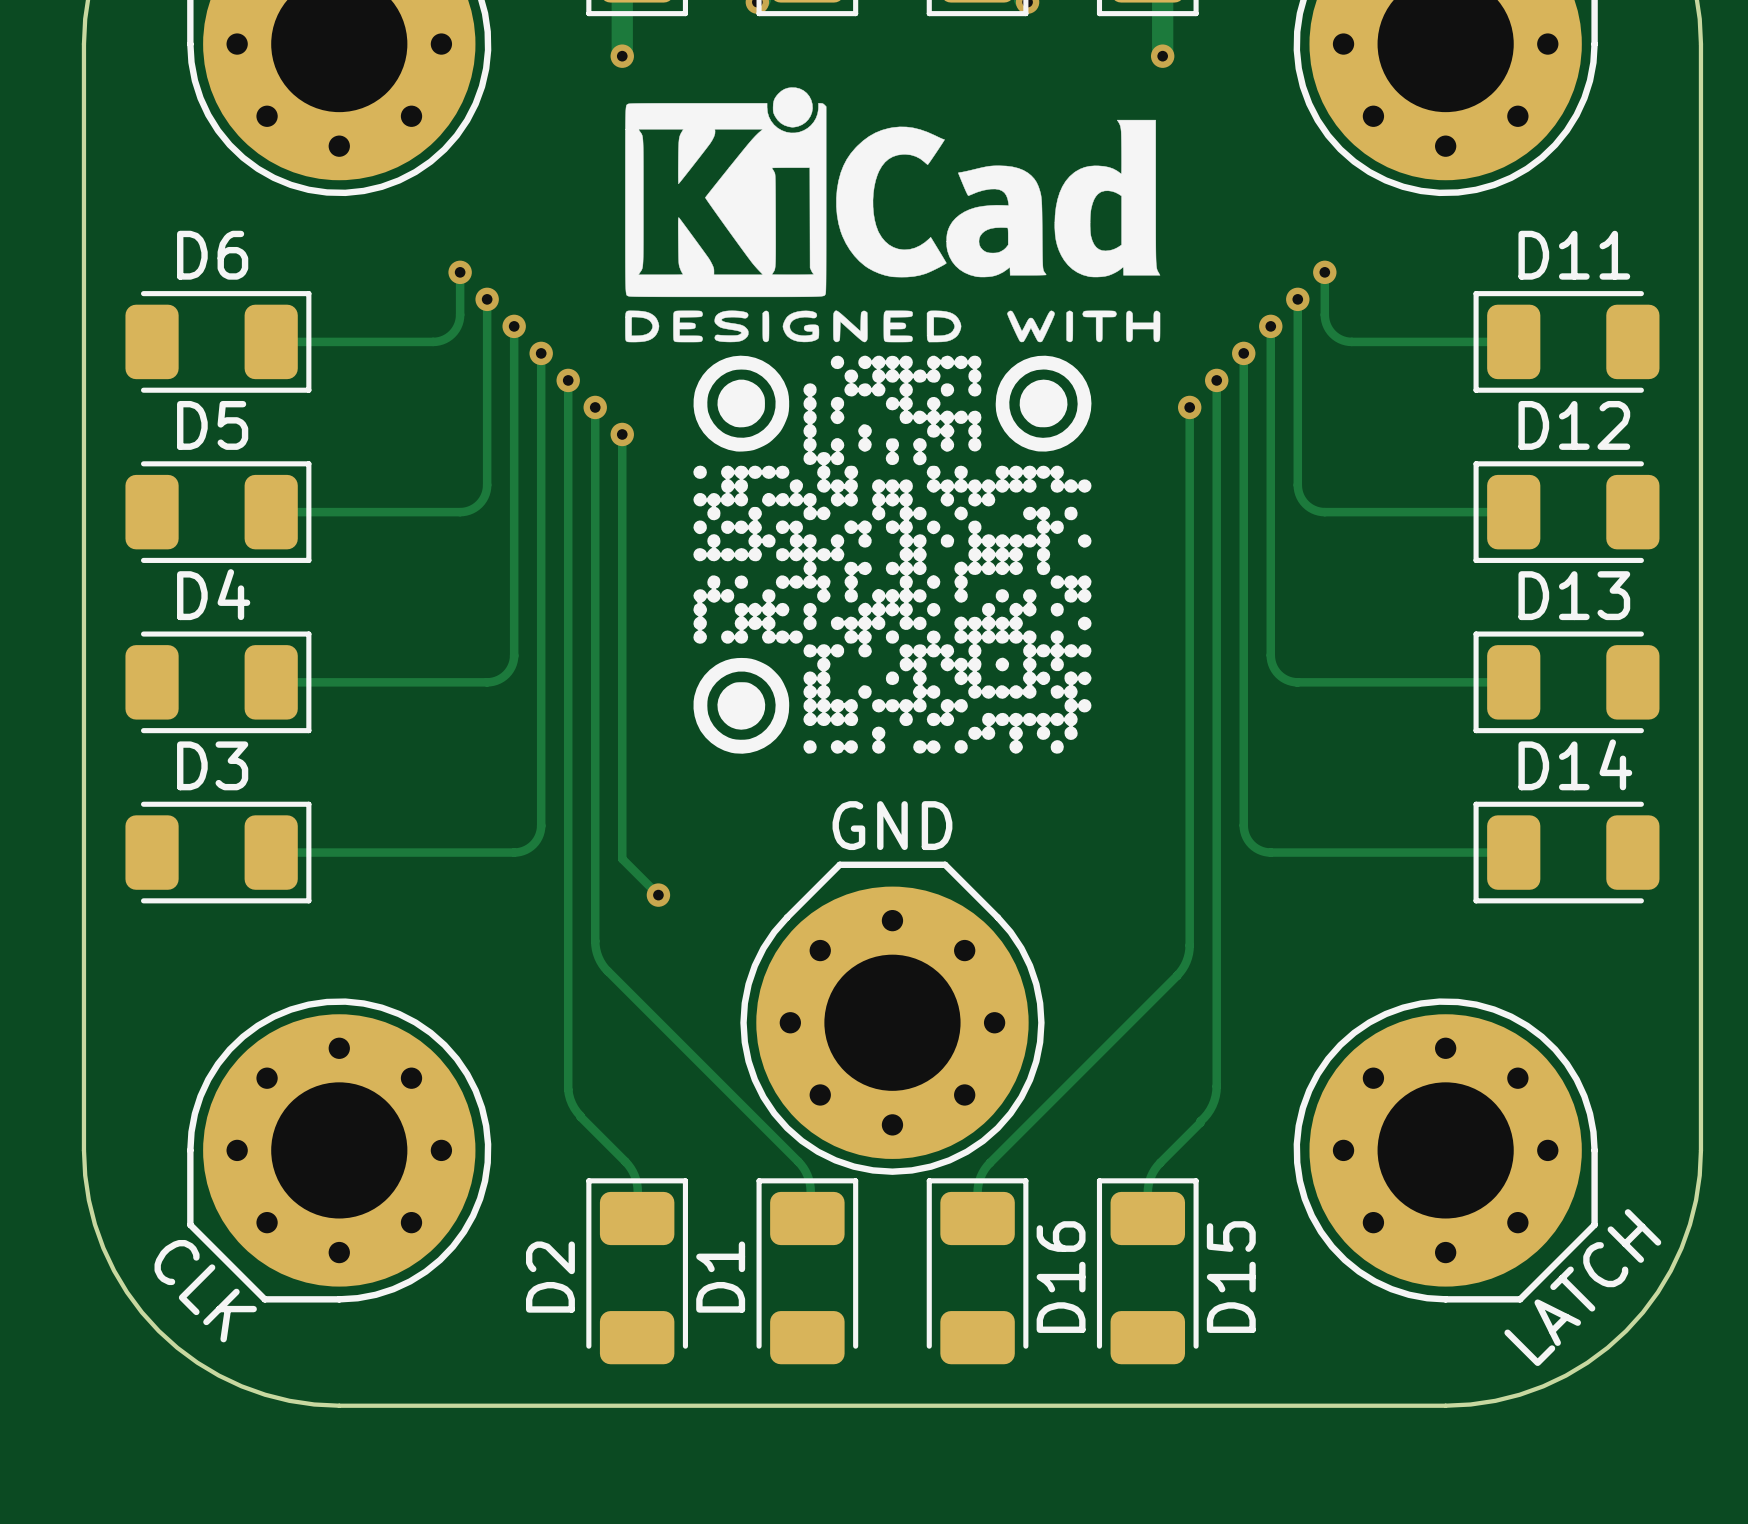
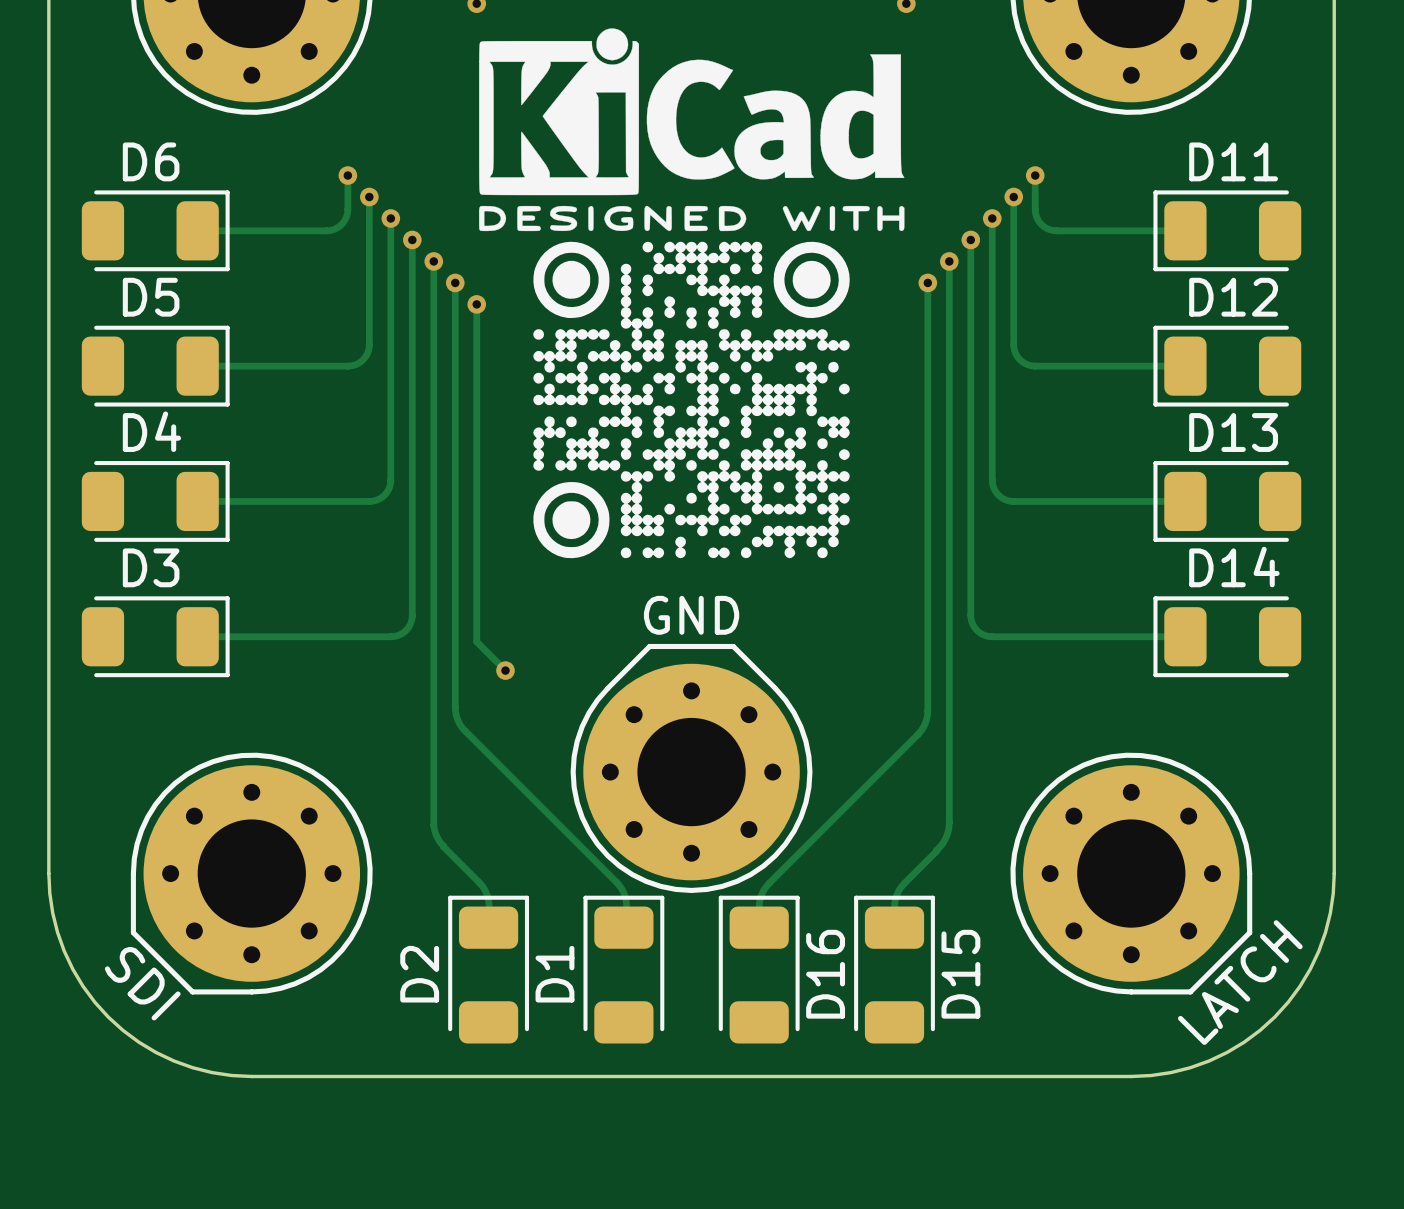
text: CLK (205, 1291) -> SDI (142, 983)

